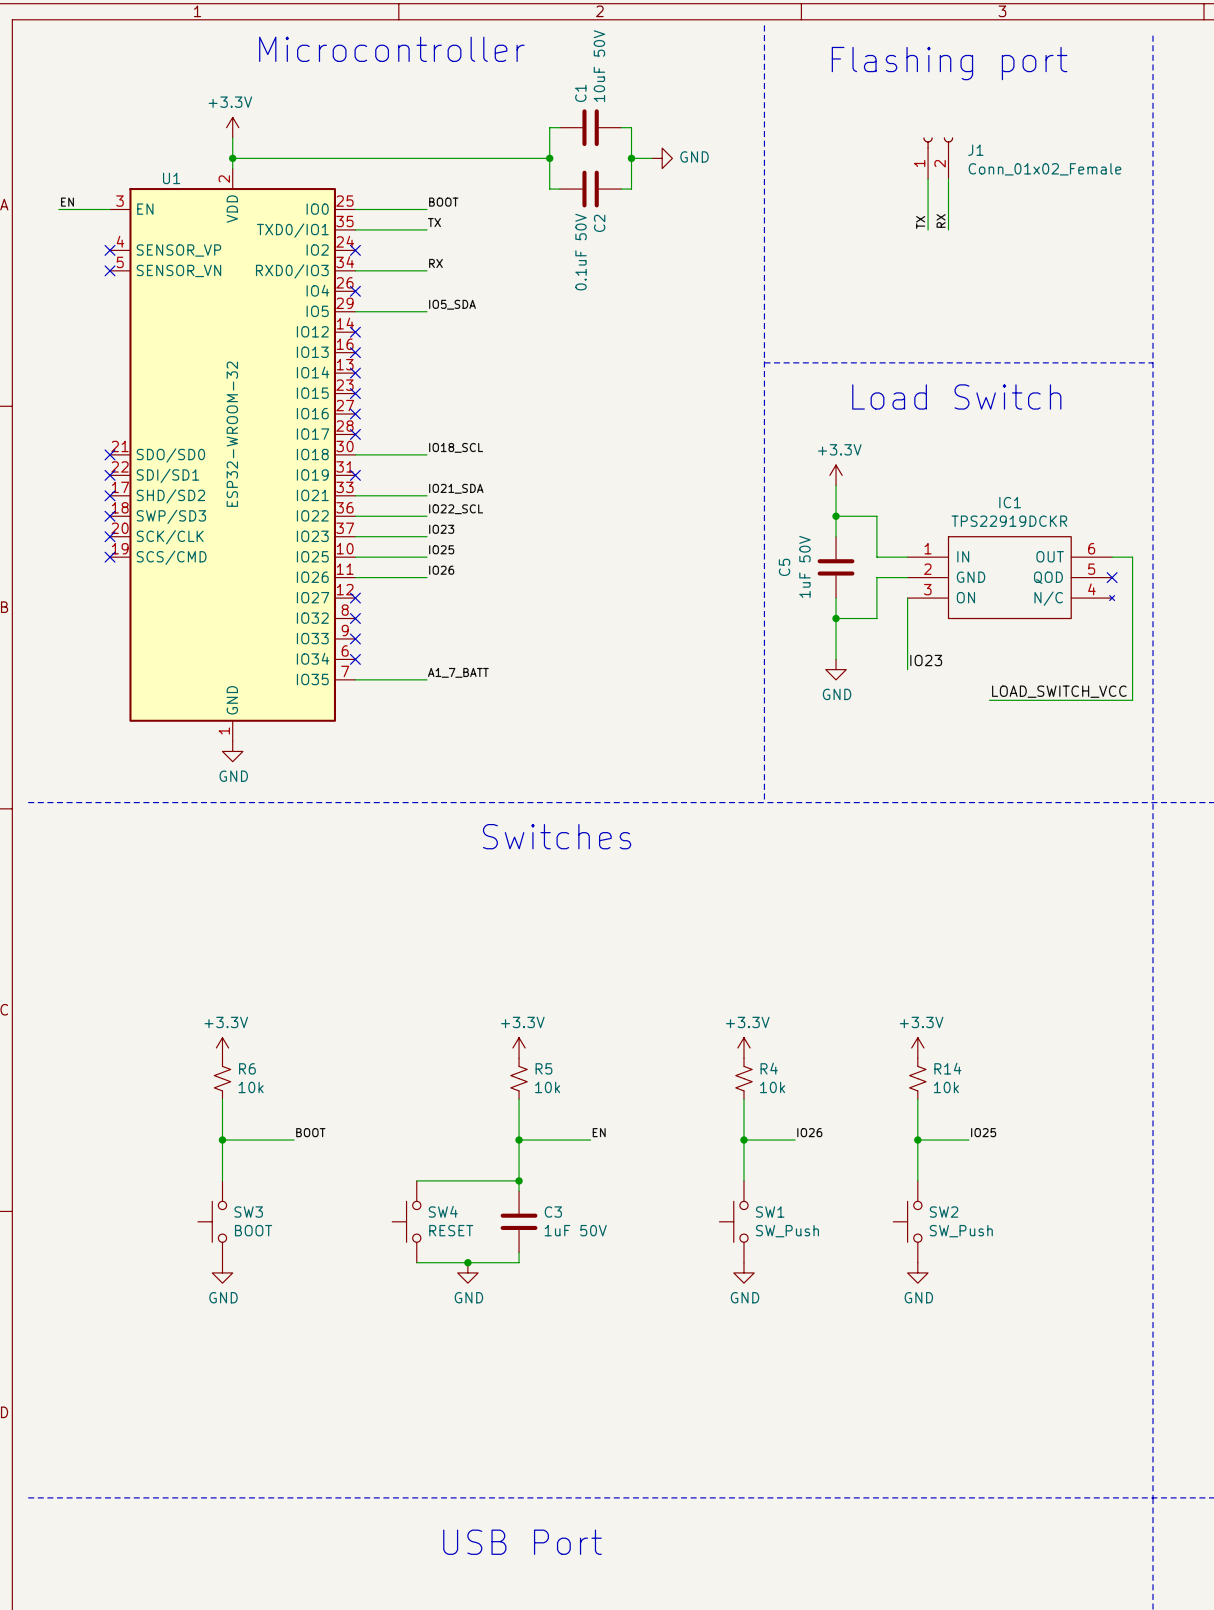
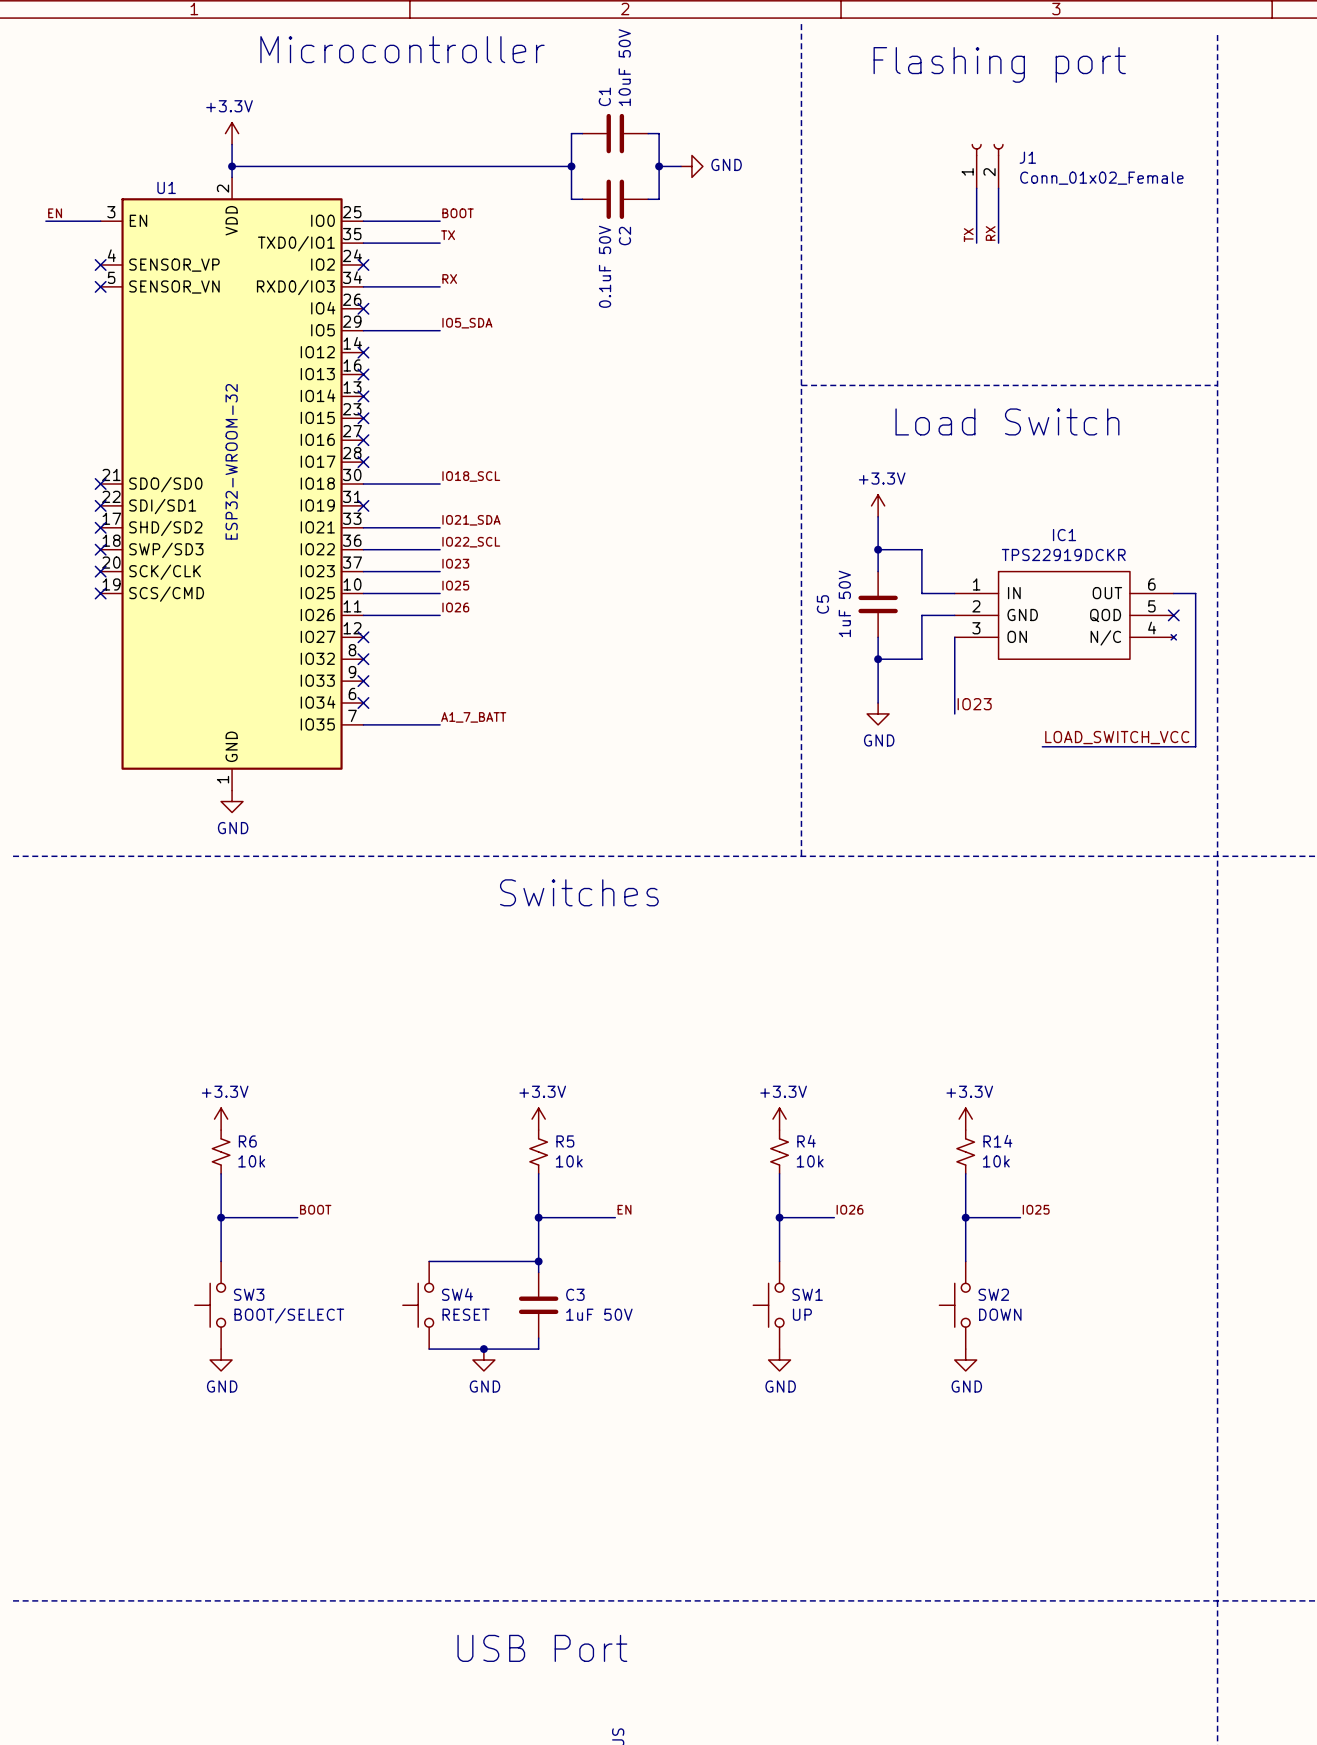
SW3 value: BOOT (253, 1230) -> BOOT/SELECT (289, 1315)
SW1 value: SW_Push (787, 1231) -> UP (802, 1314)
SW2 value: SW_Push (961, 1231) -> DOWN (1000, 1314)

